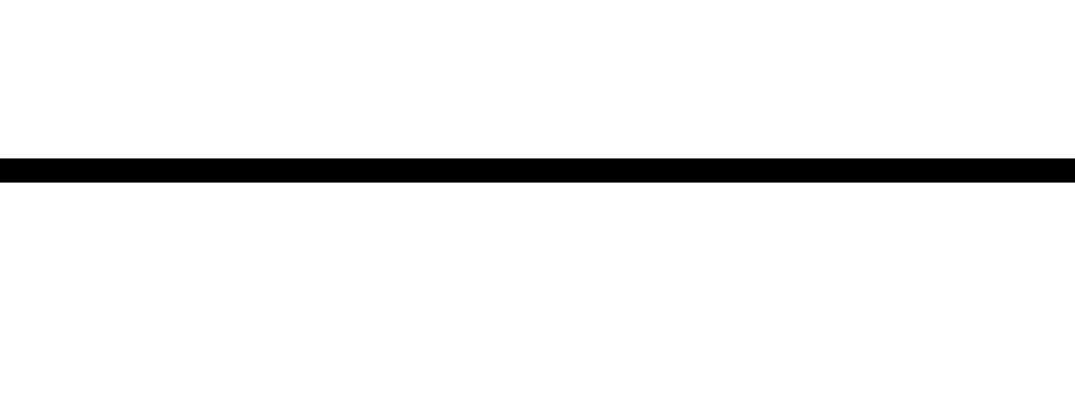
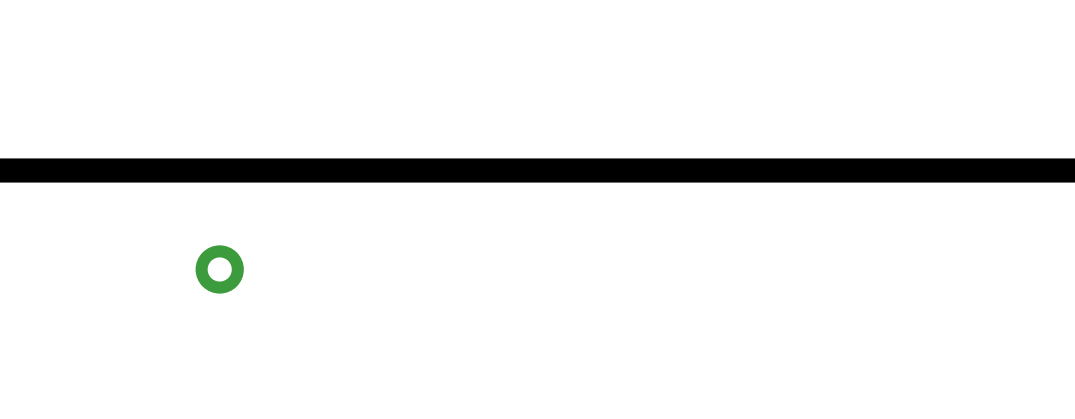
via: none -> (219, 269)

